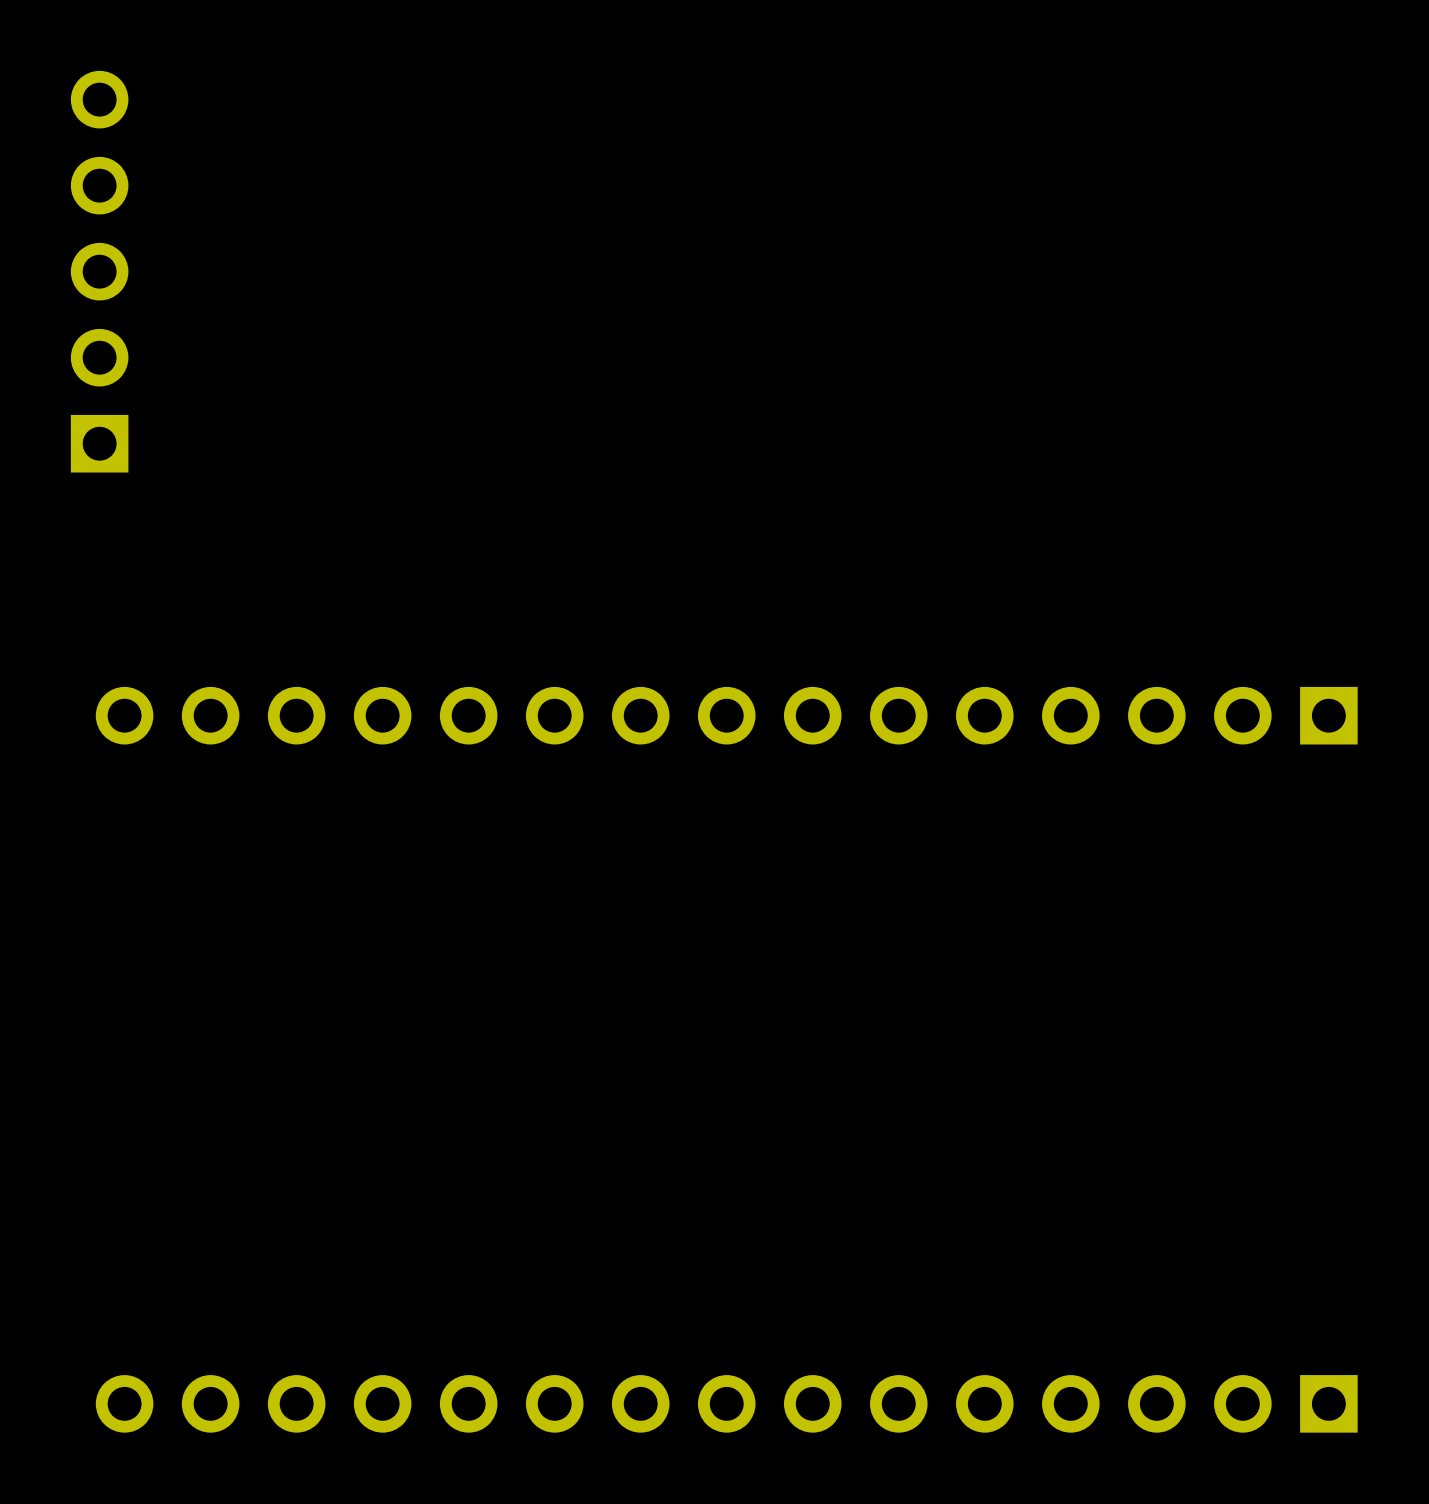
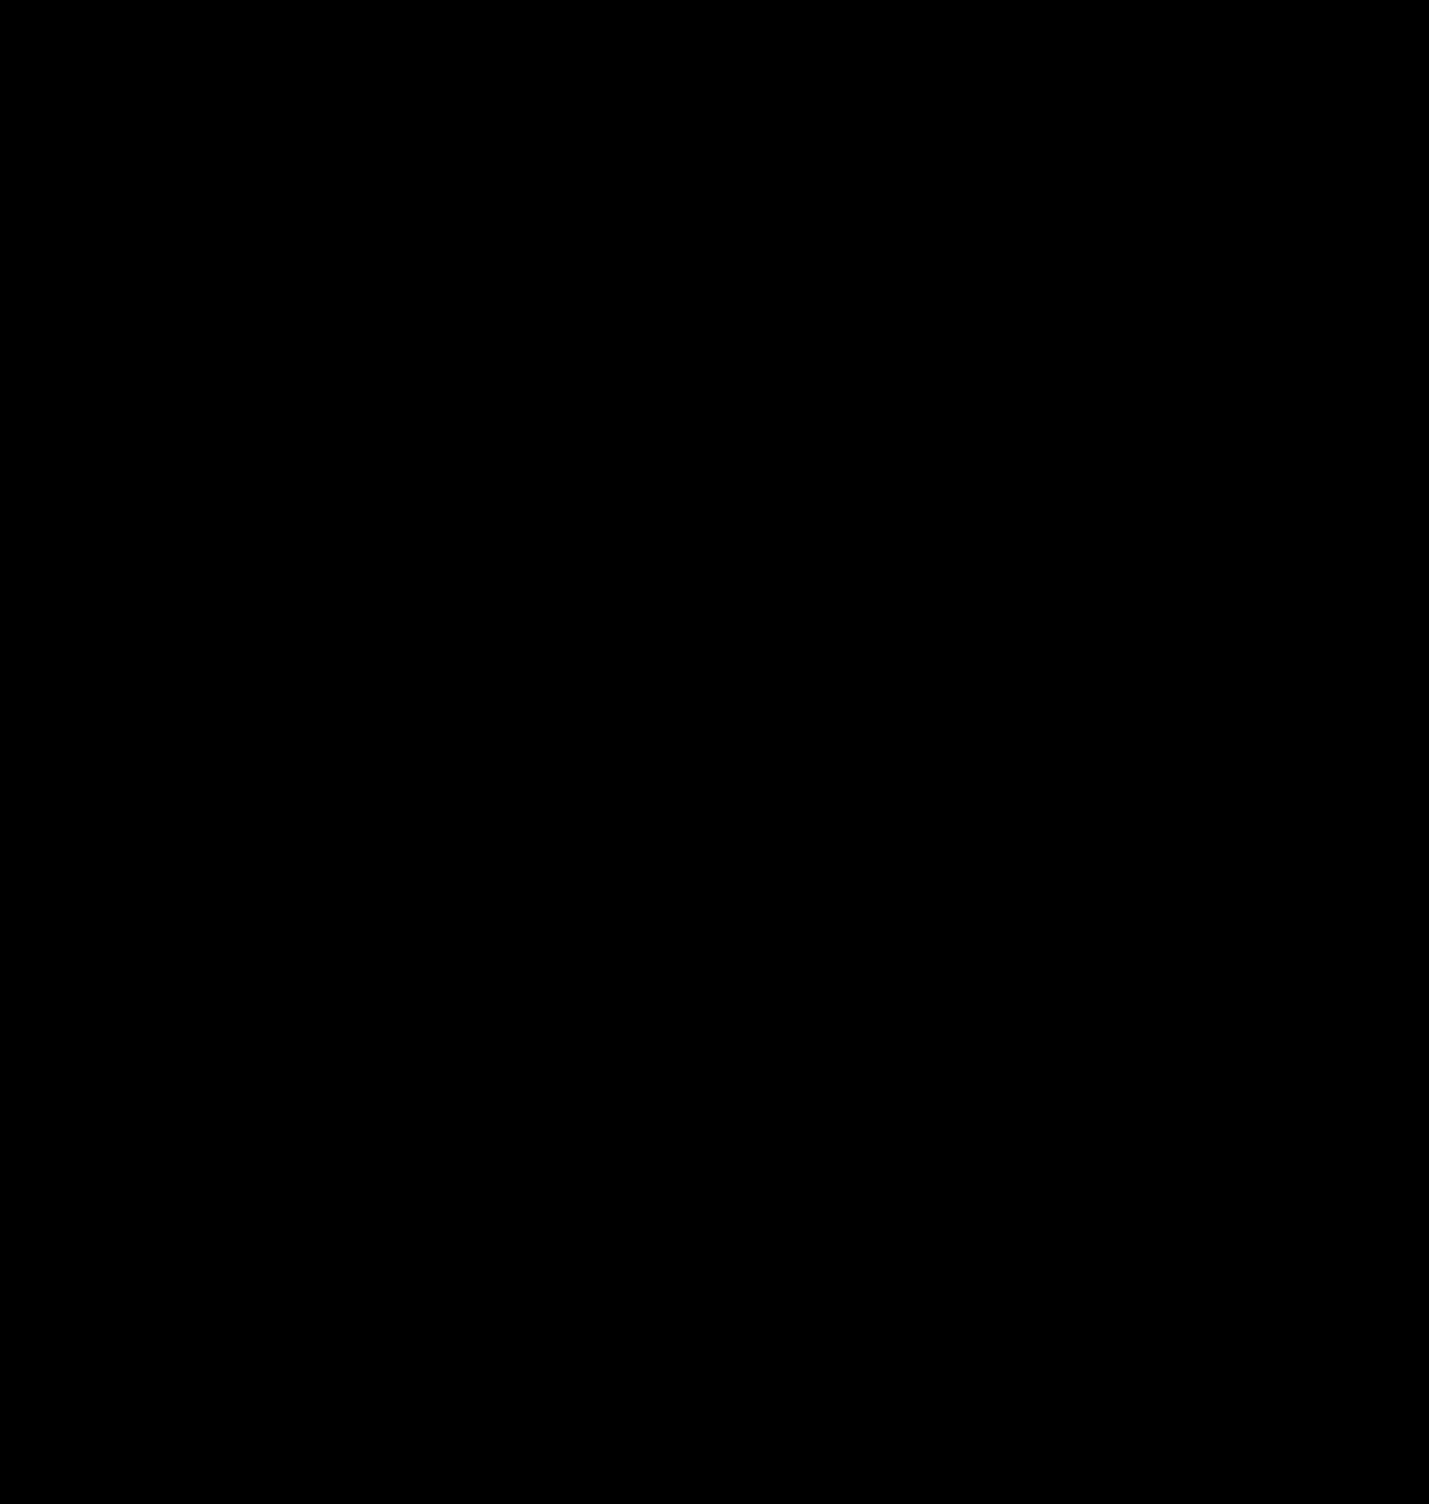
part: (99, 271) -> none
part: (726, 715) -> none
part: (726, 1403) -> none

